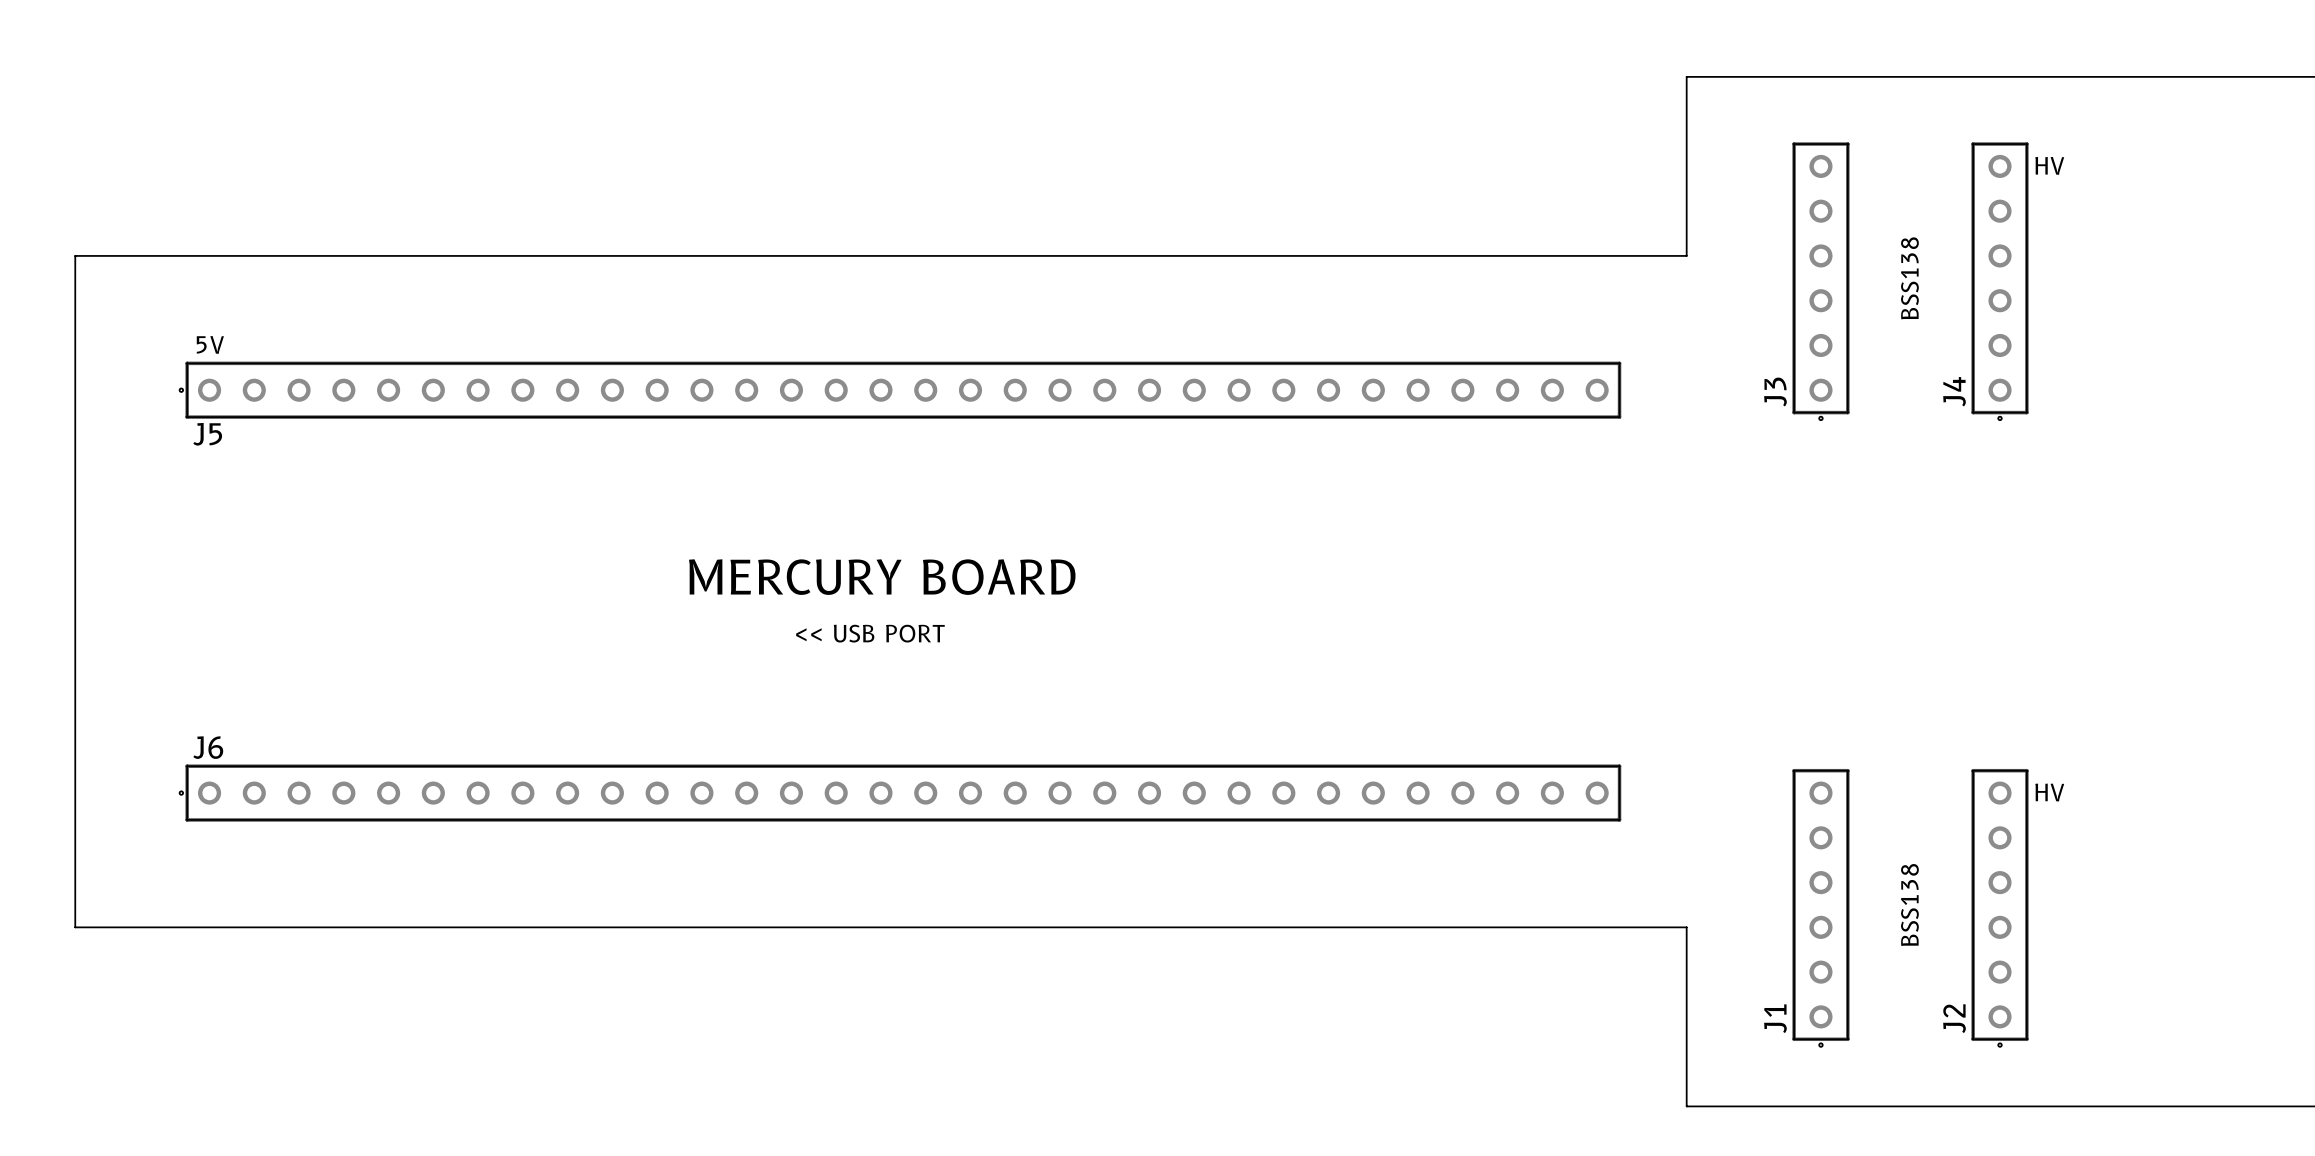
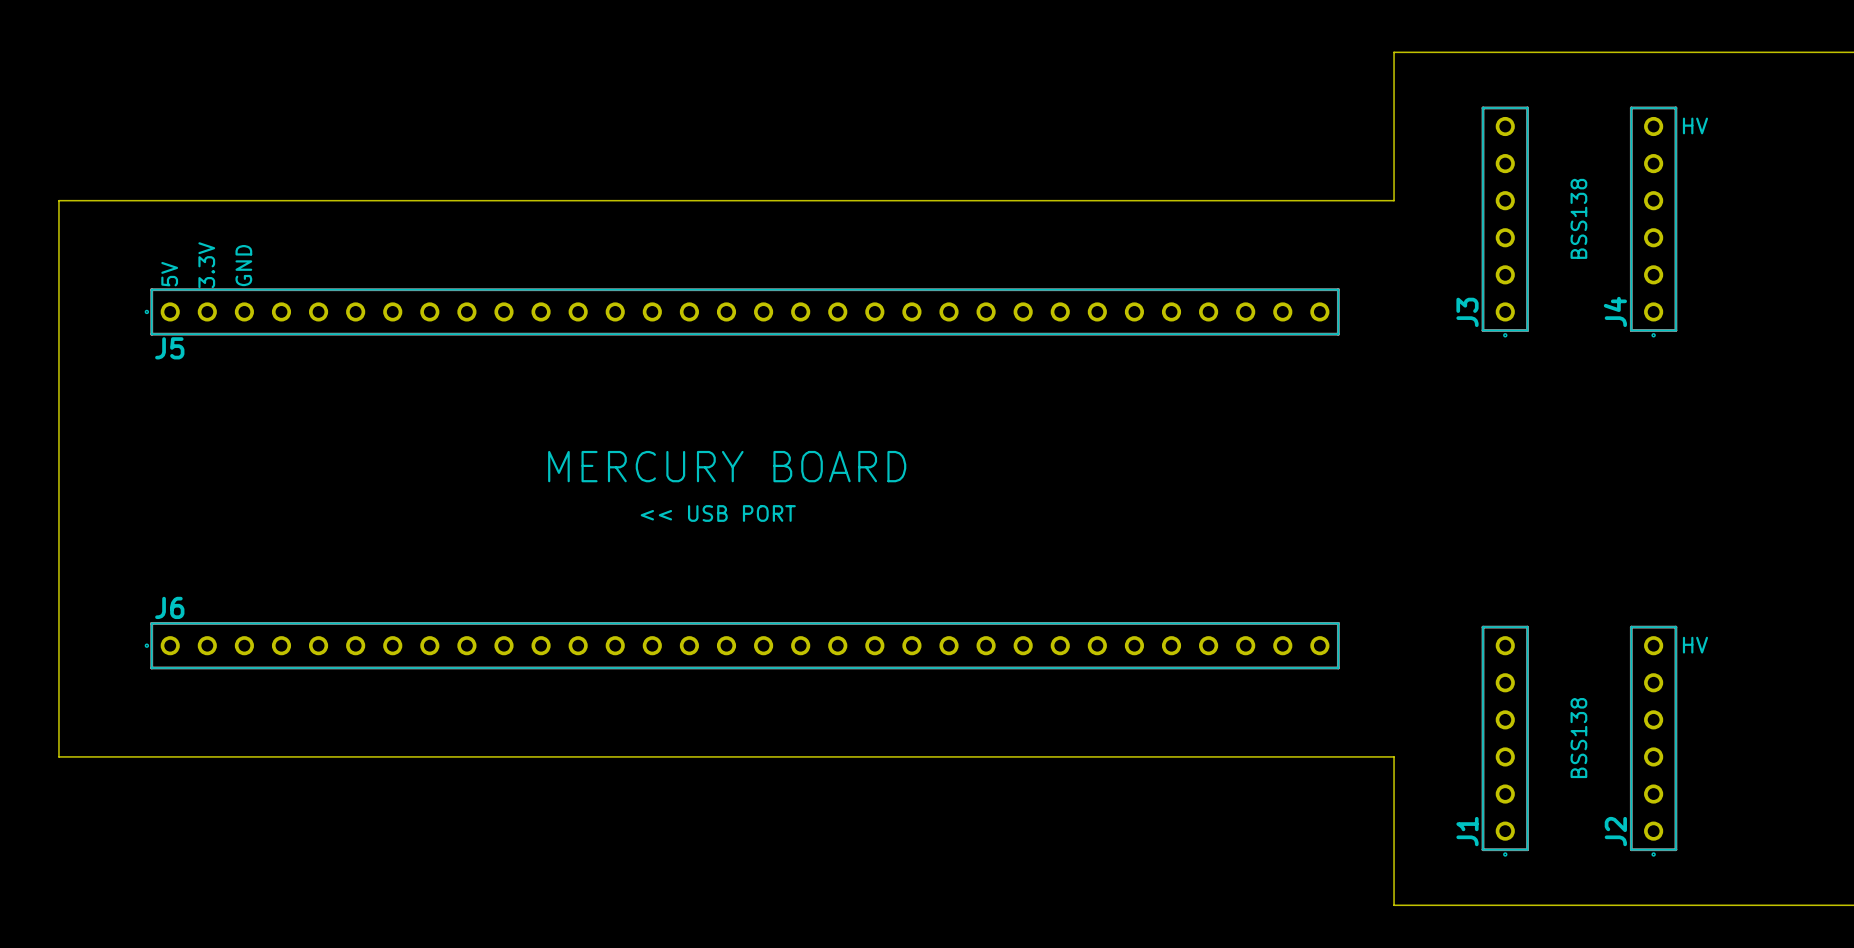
text: none -> 3.3V (206, 265)
text: none -> GND (243, 265)
text rotation: 0° (210, 344) -> 90° counterclockwise (169, 274)

